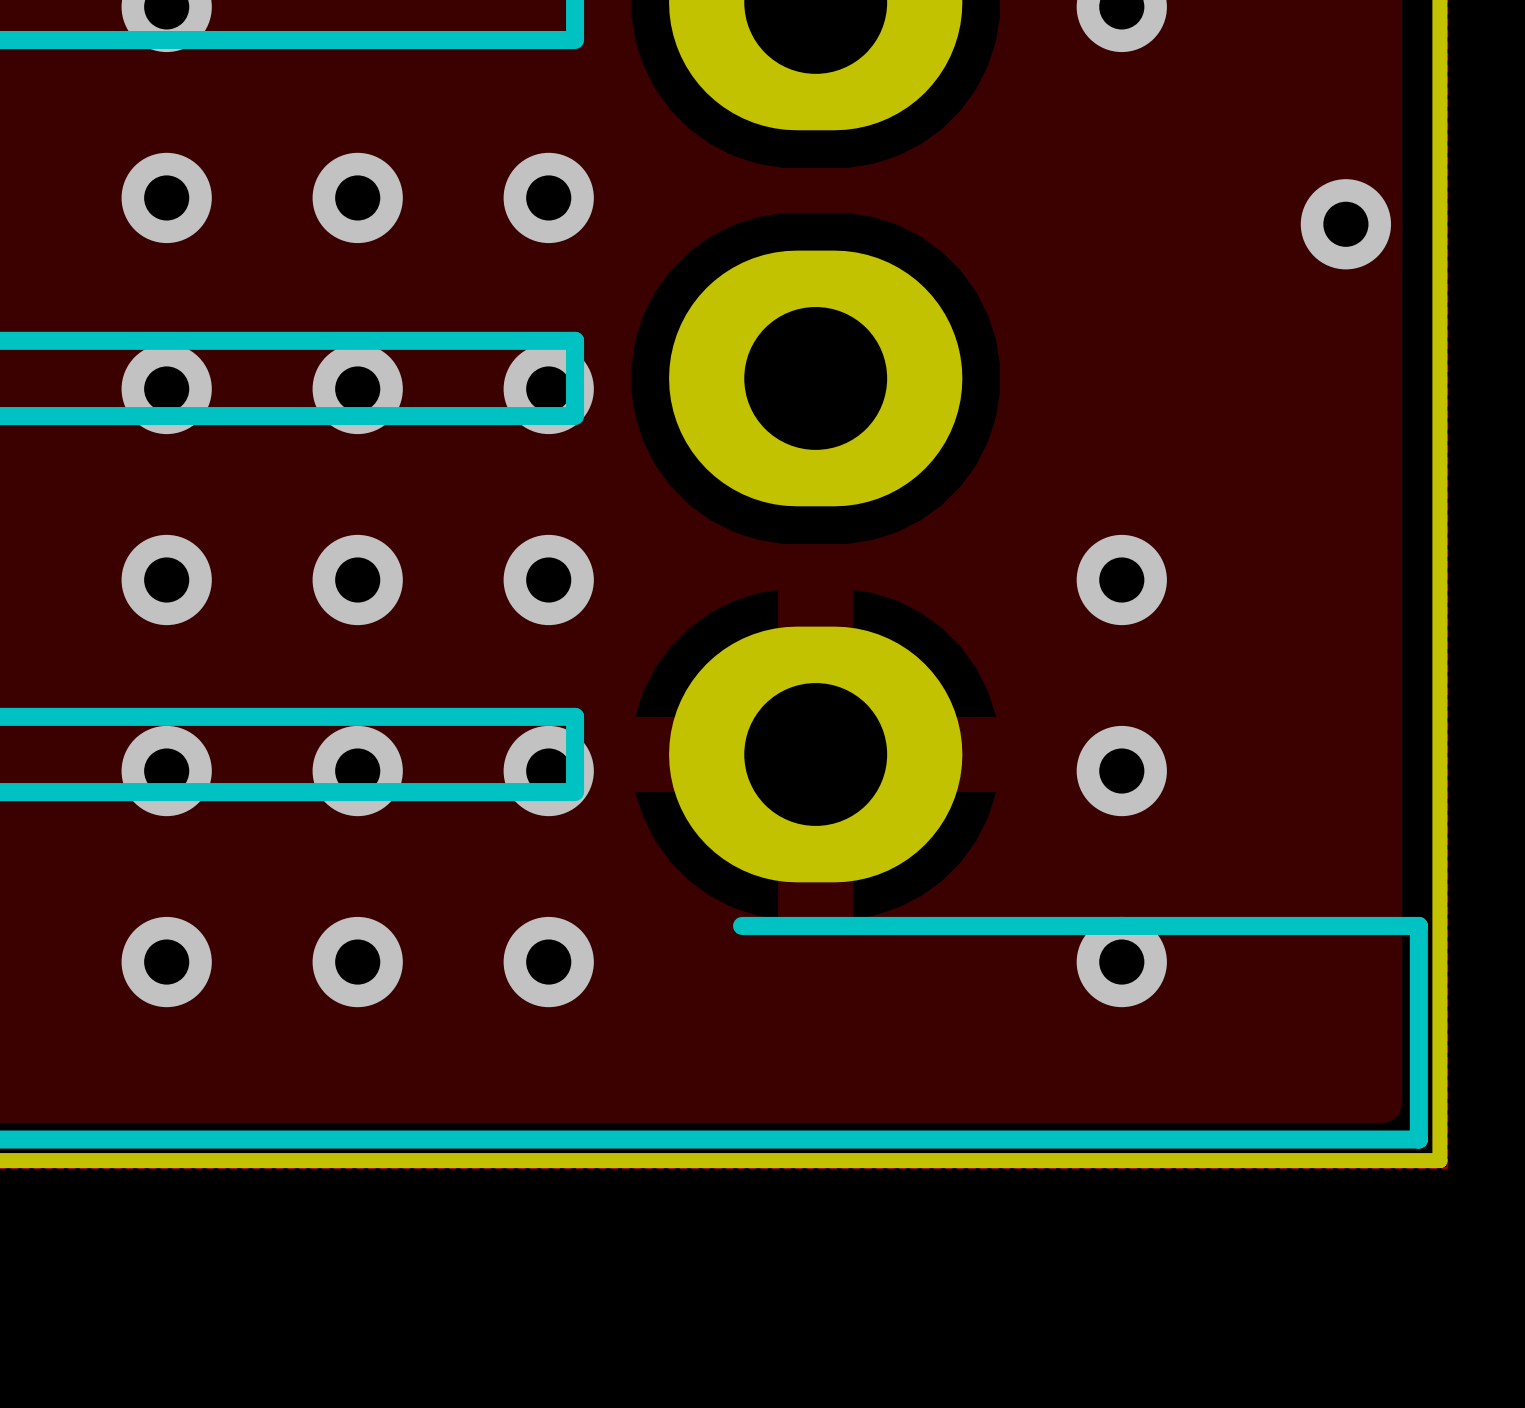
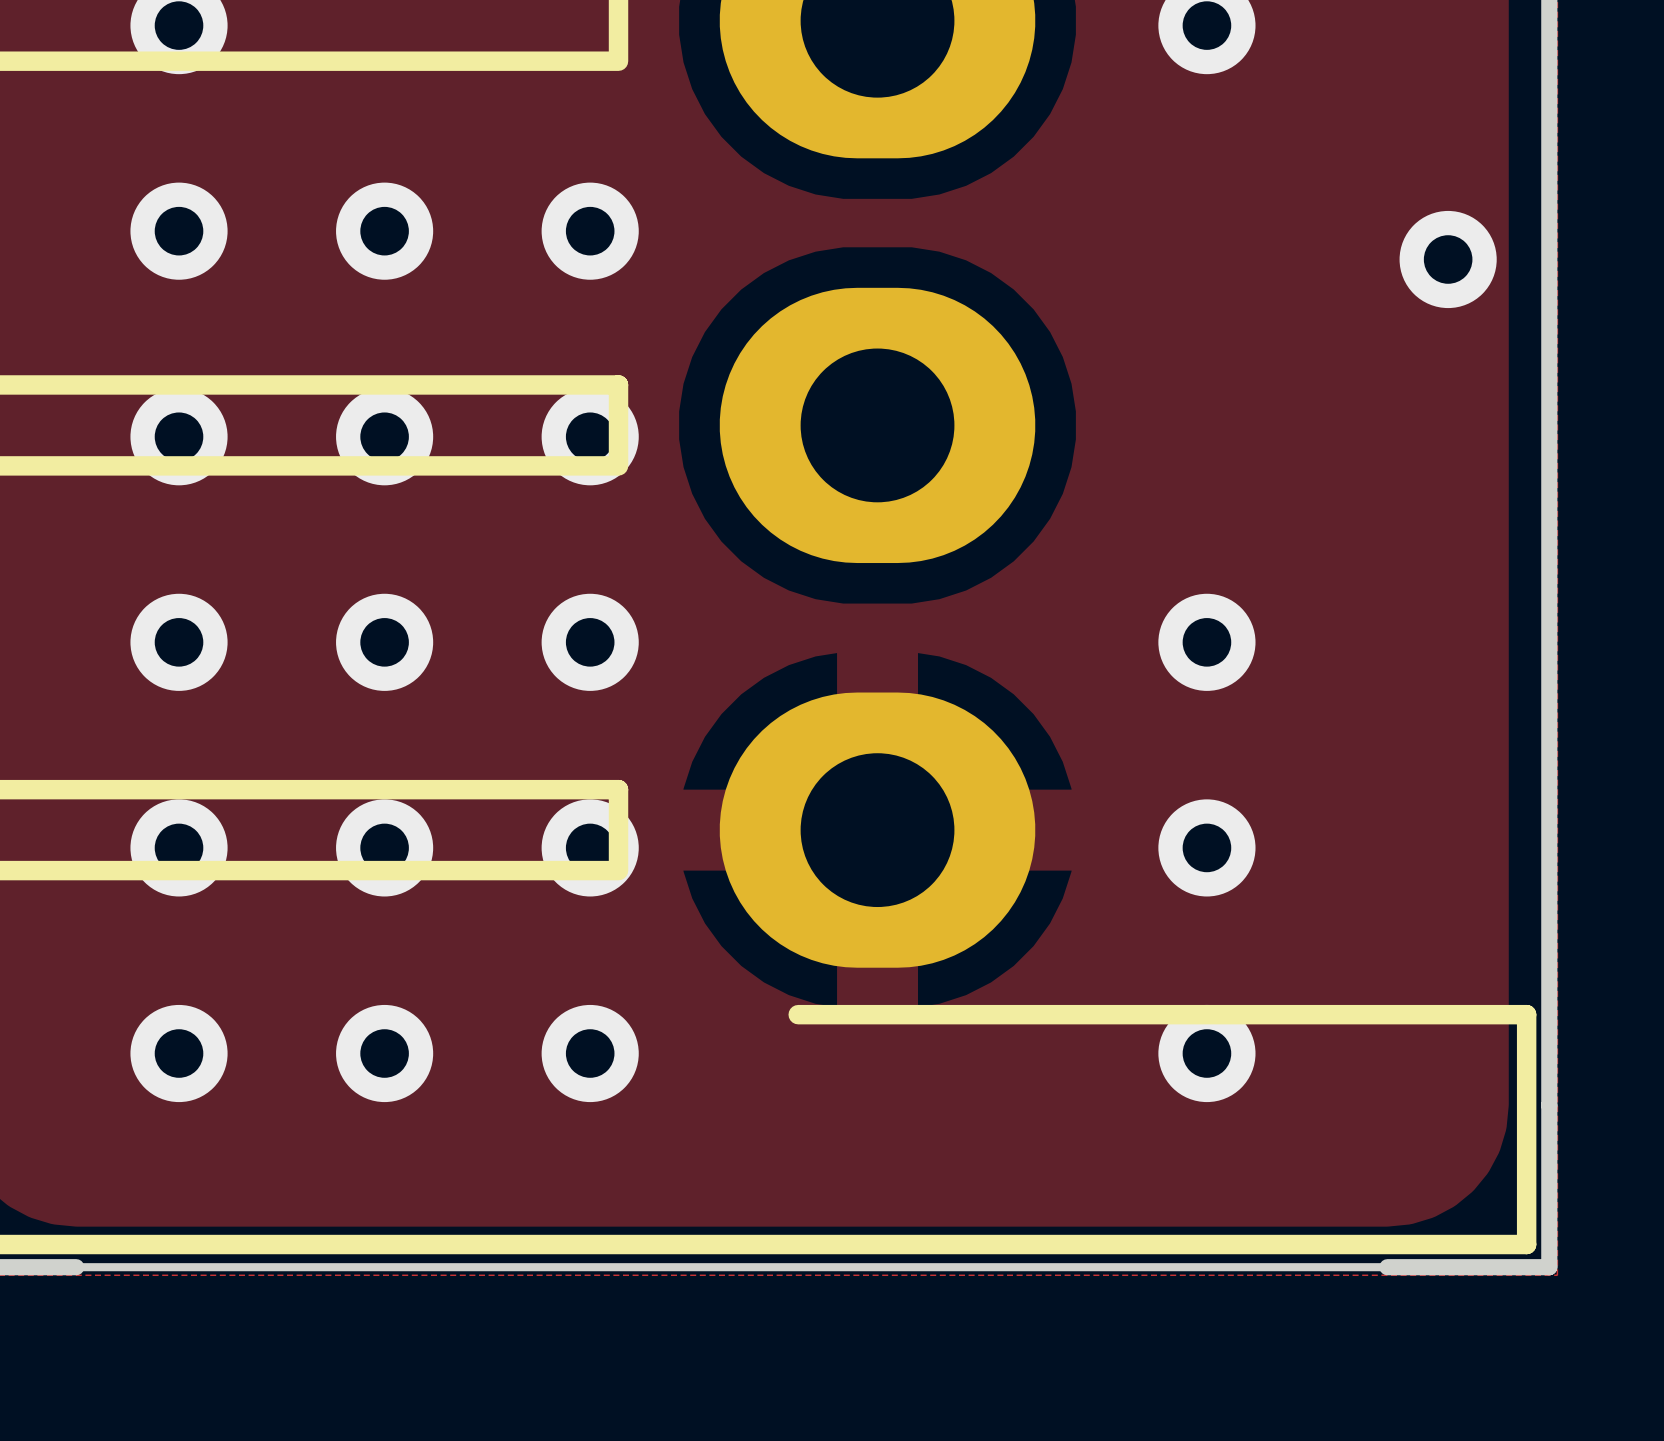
board edge width: thick (71, 1160) (1289, 1160) -> thin (76, 1267) (1387, 1267)

